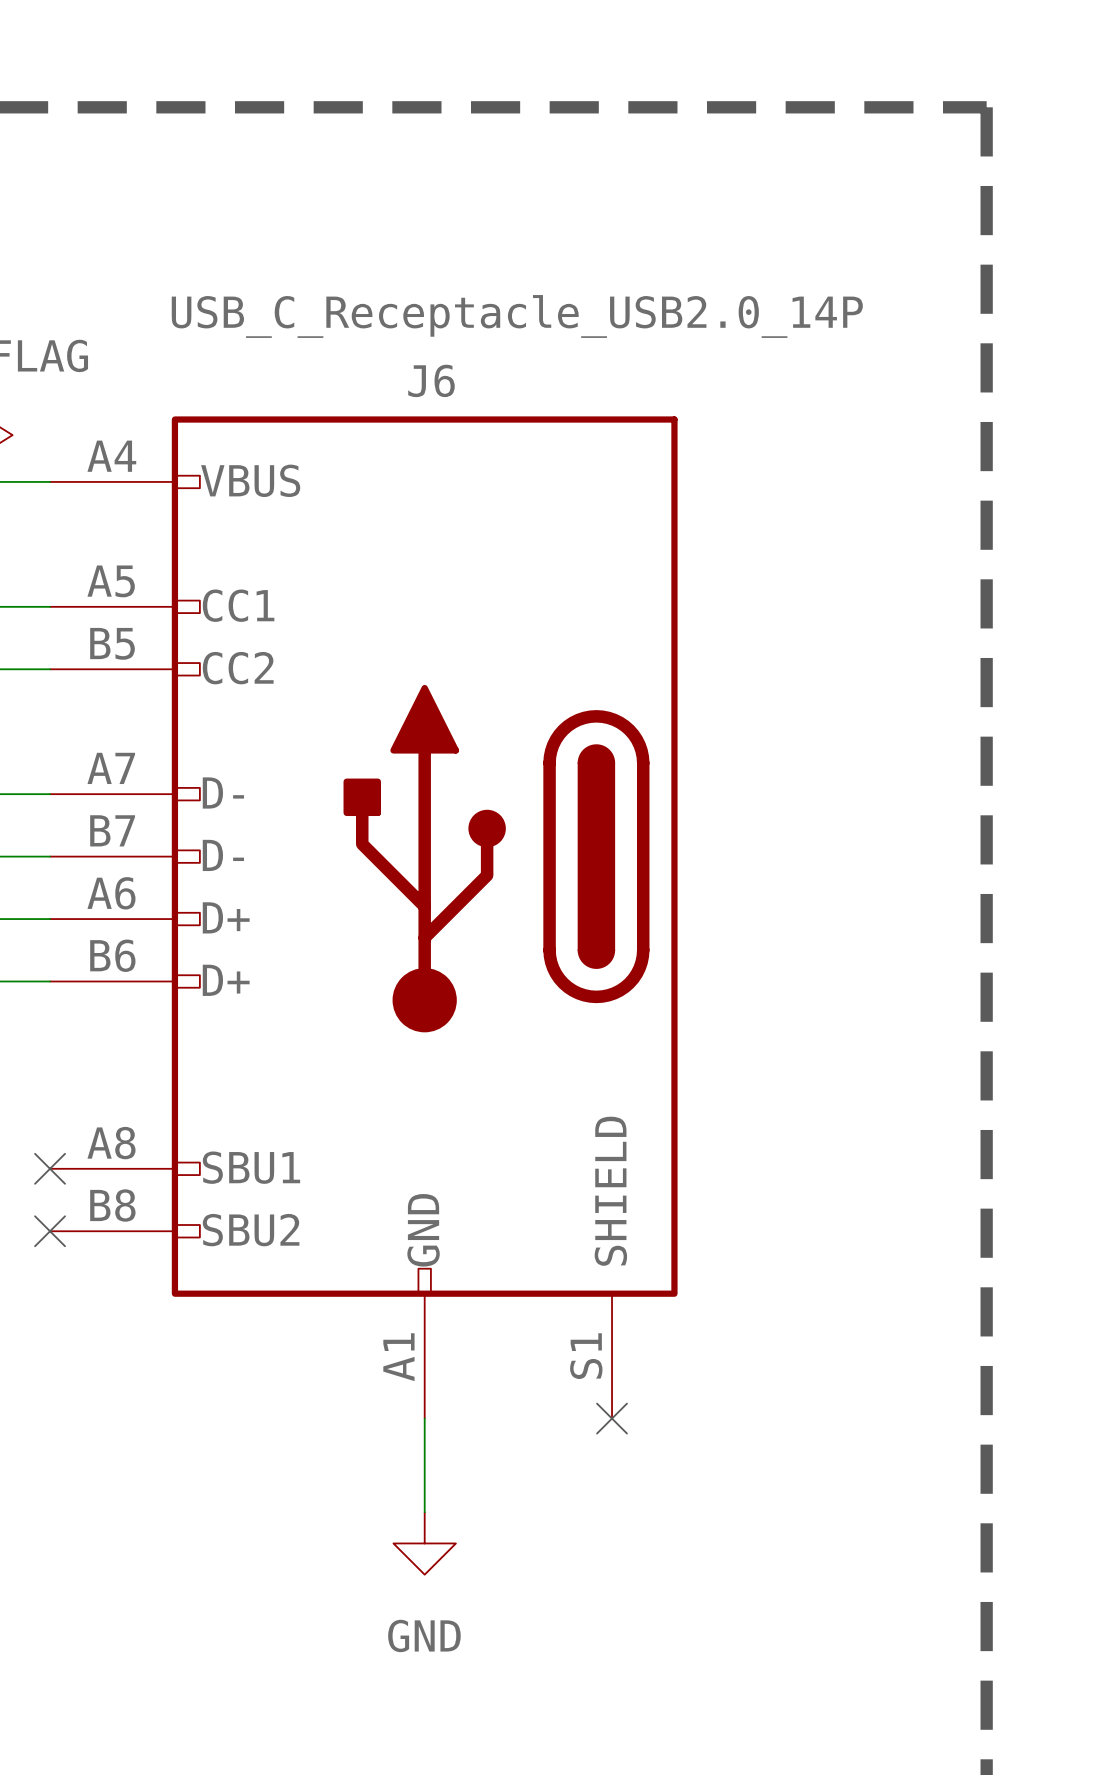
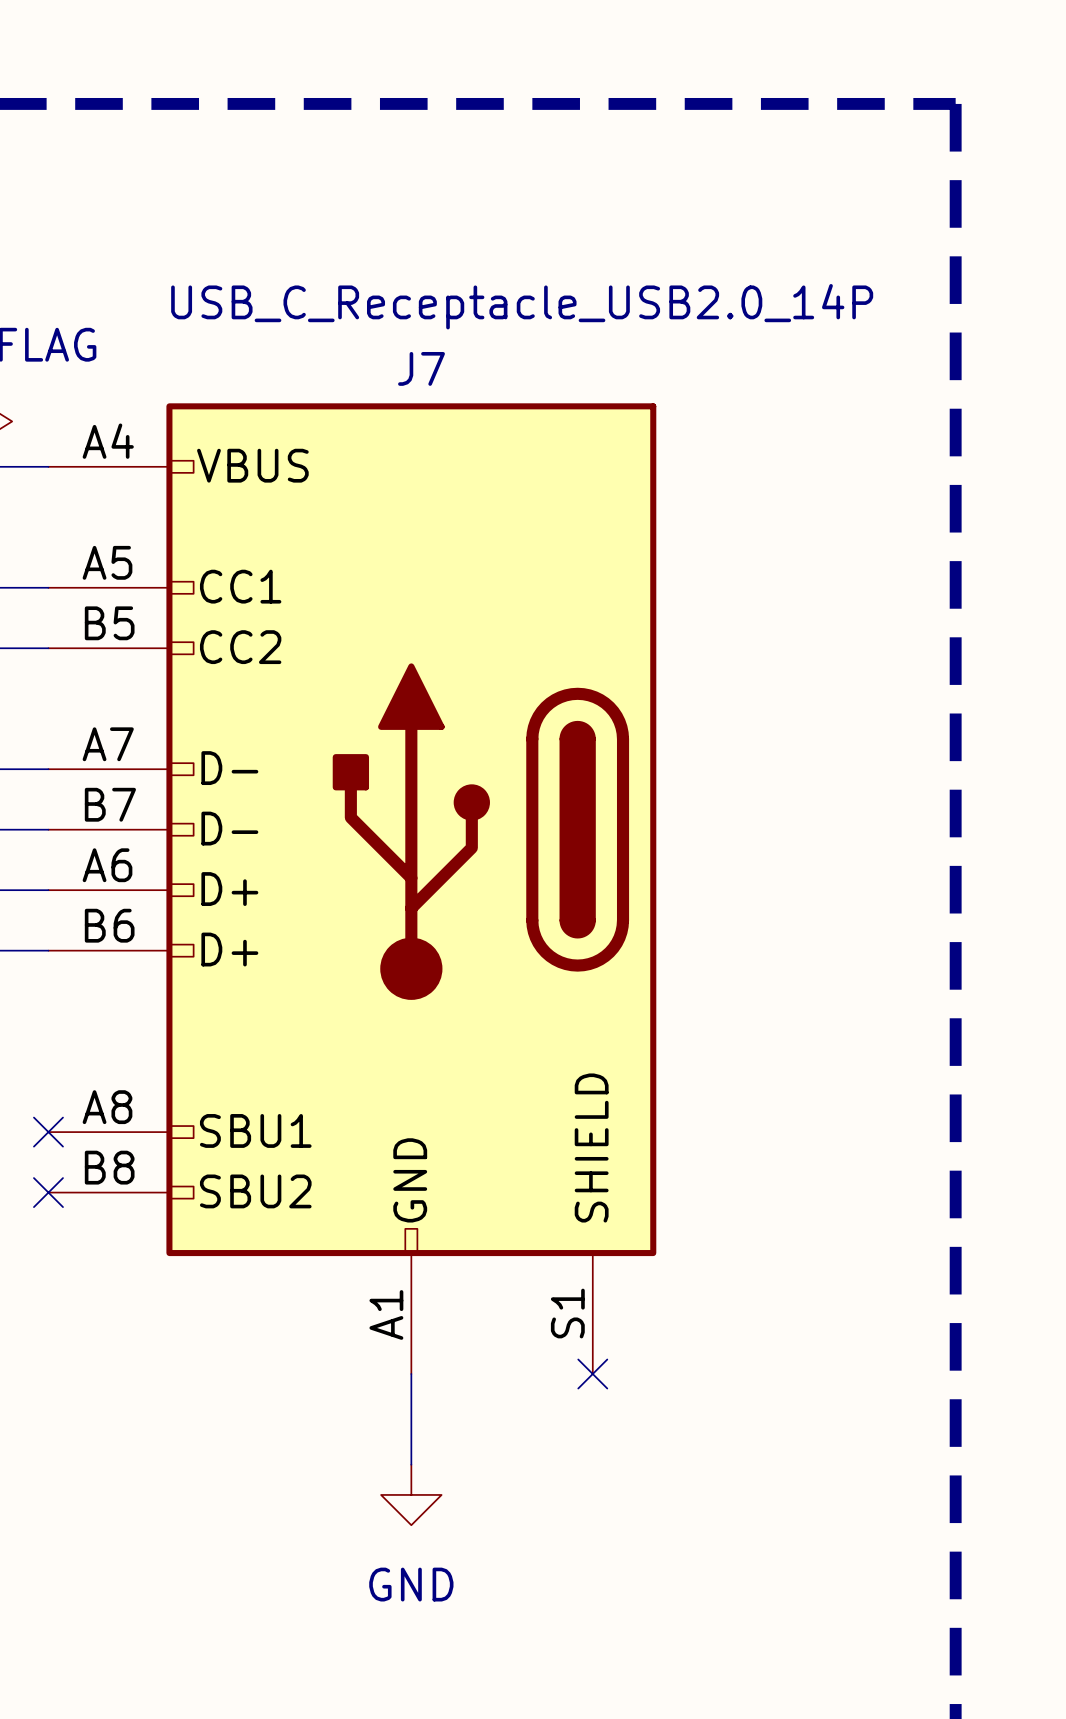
J6 name: J6 (431, 380) -> J7 (421, 368)

